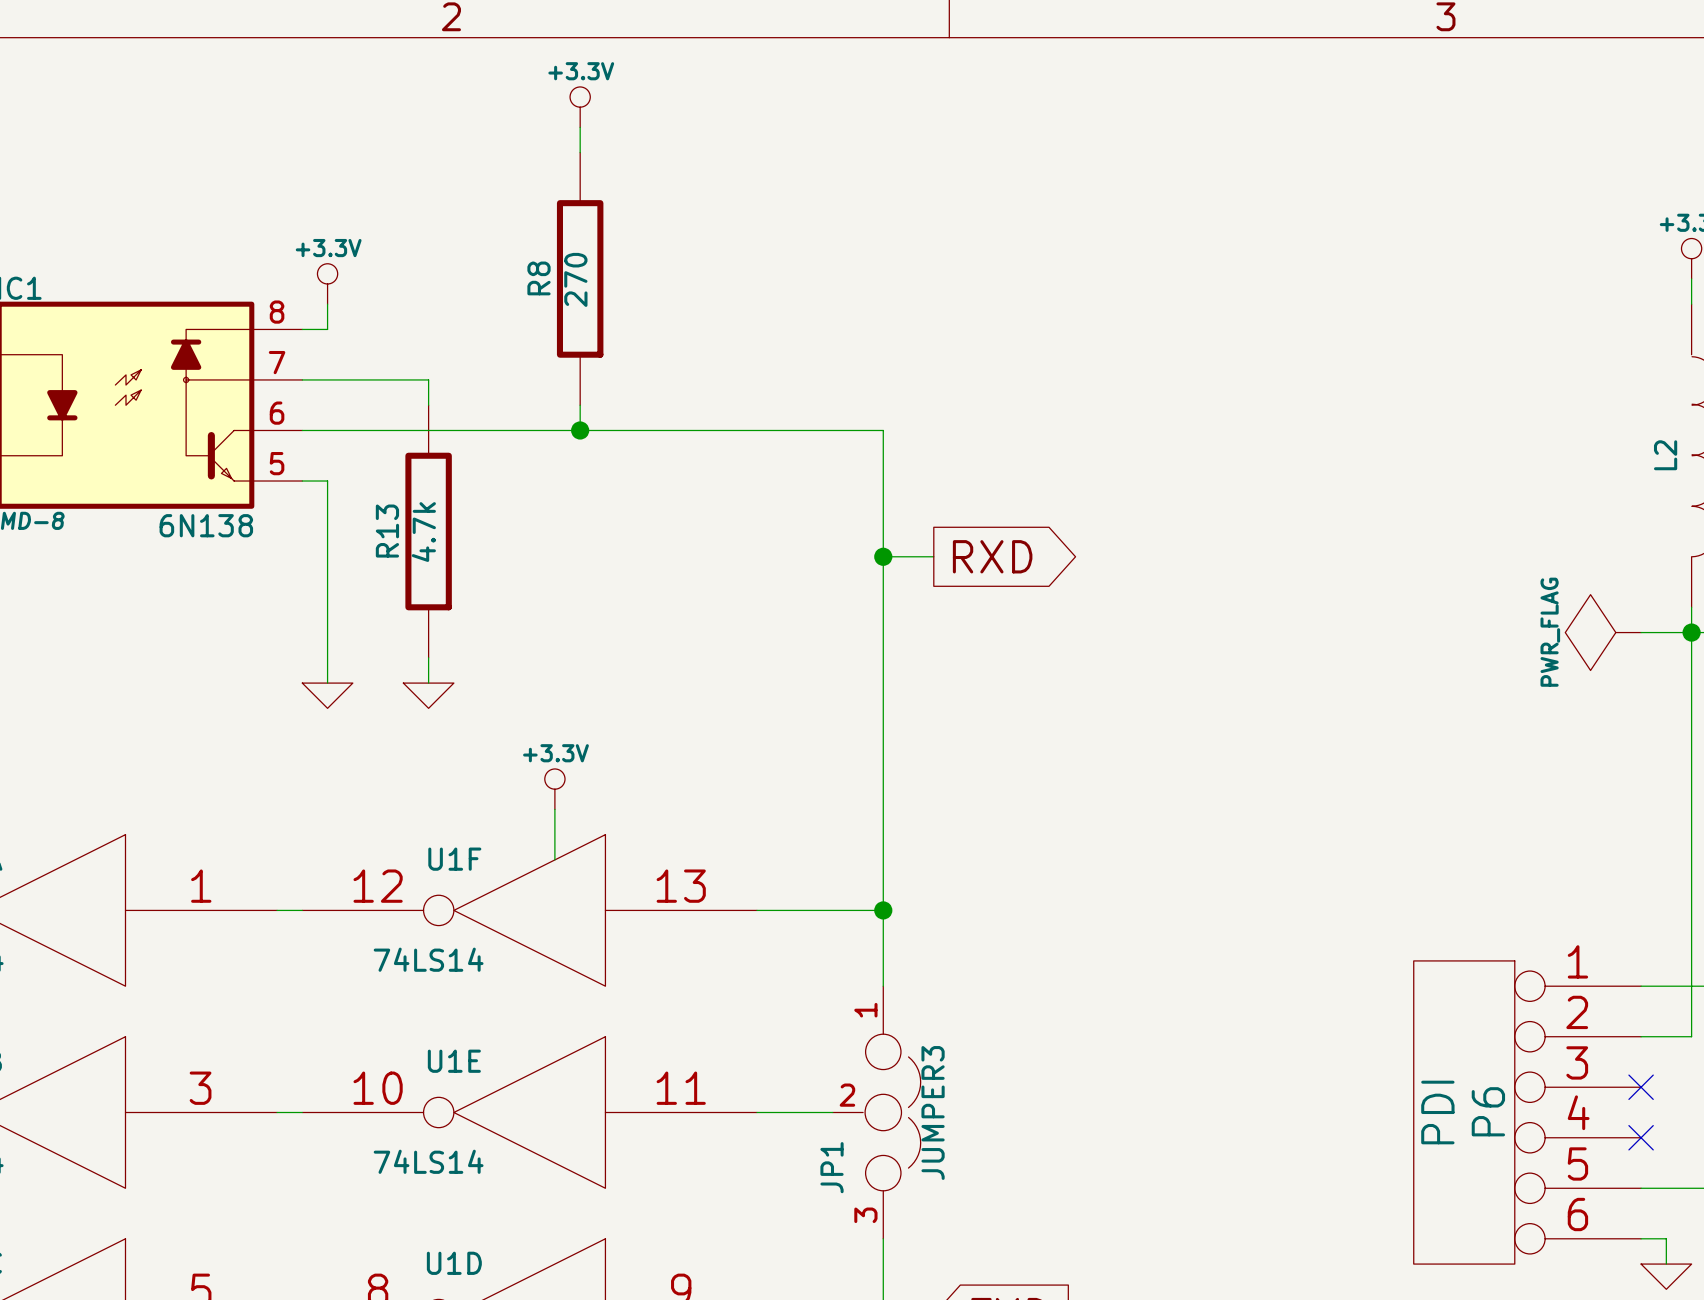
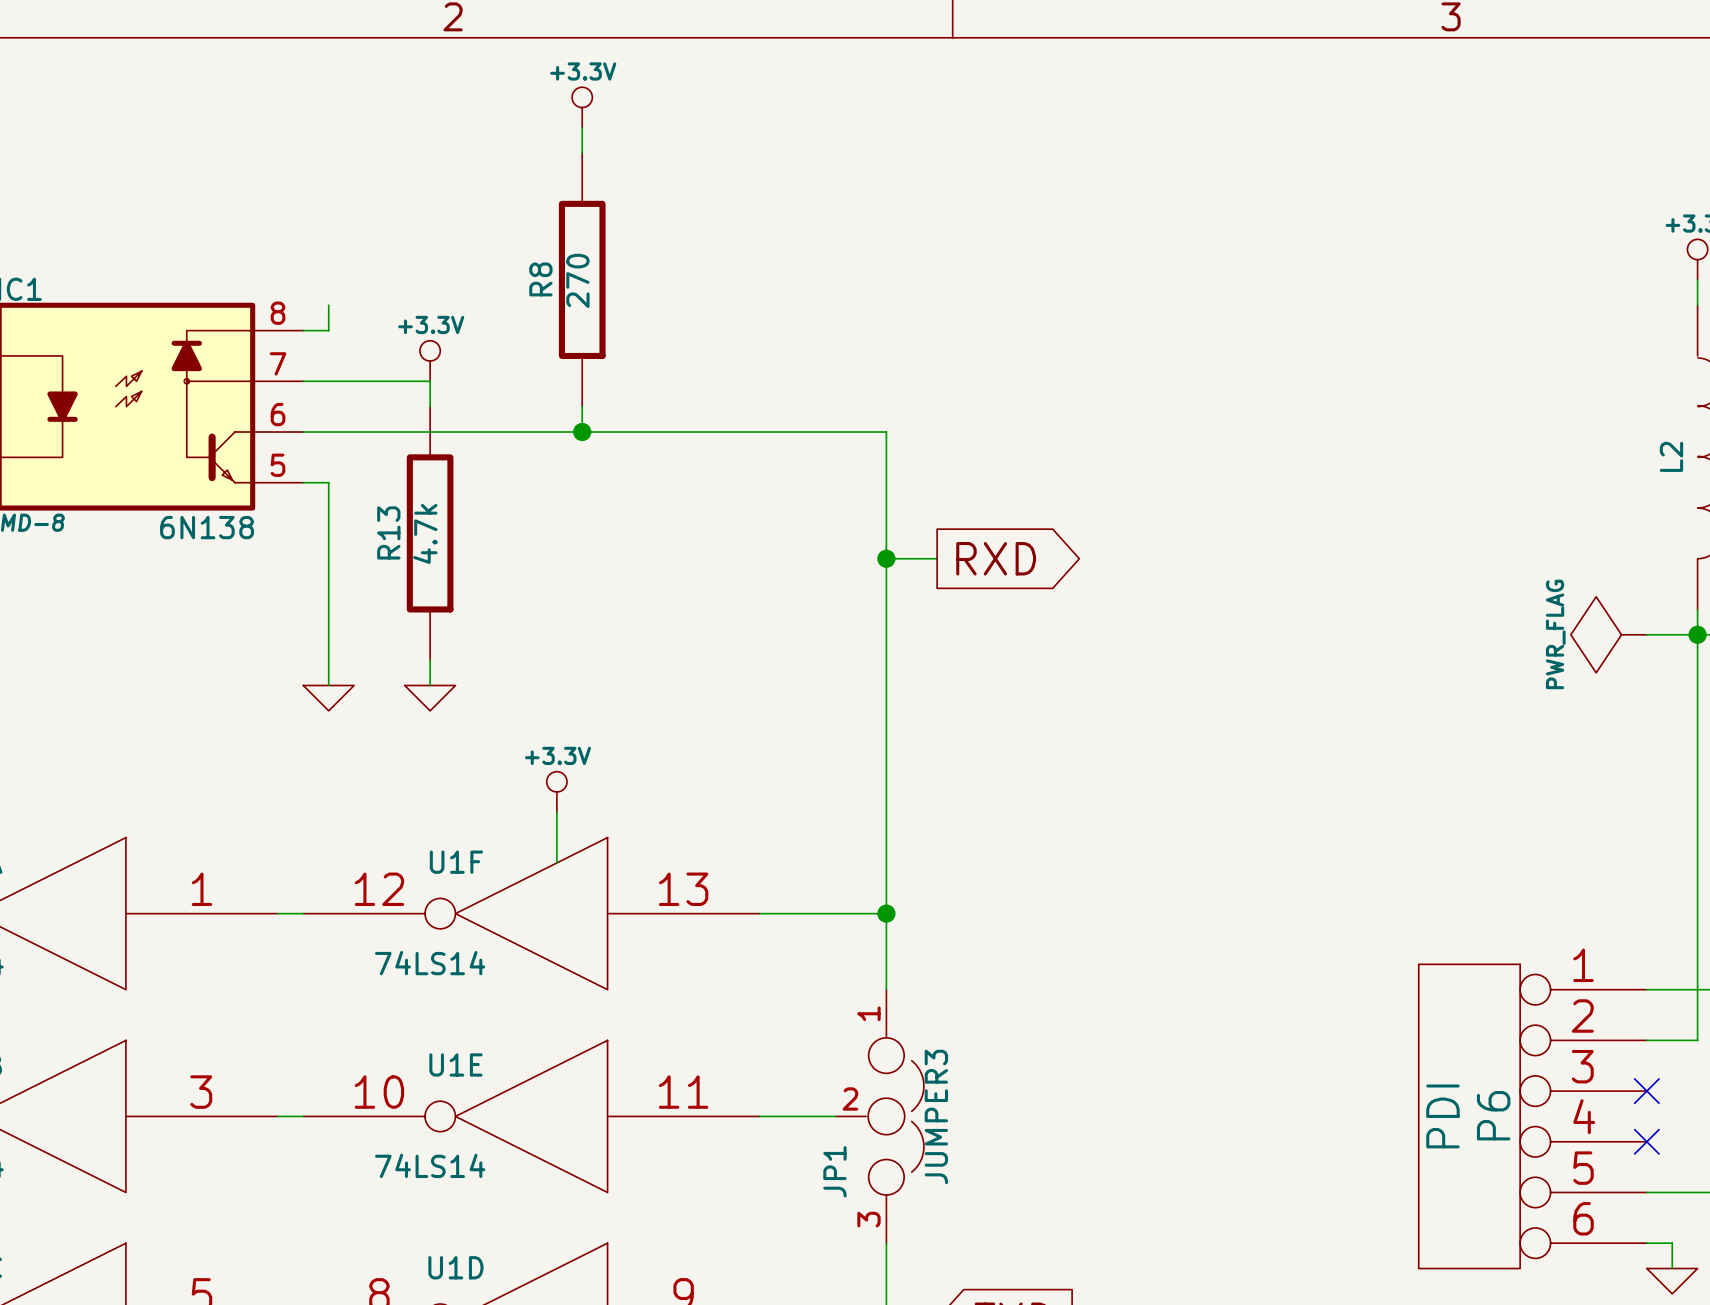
power symbol position: +3.3V (327, 283) -> +3.3V (430, 361)

